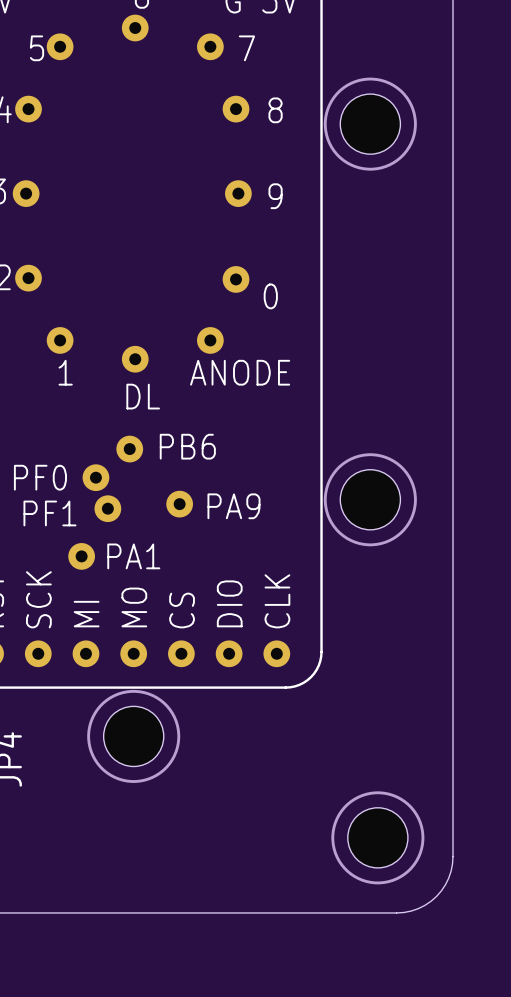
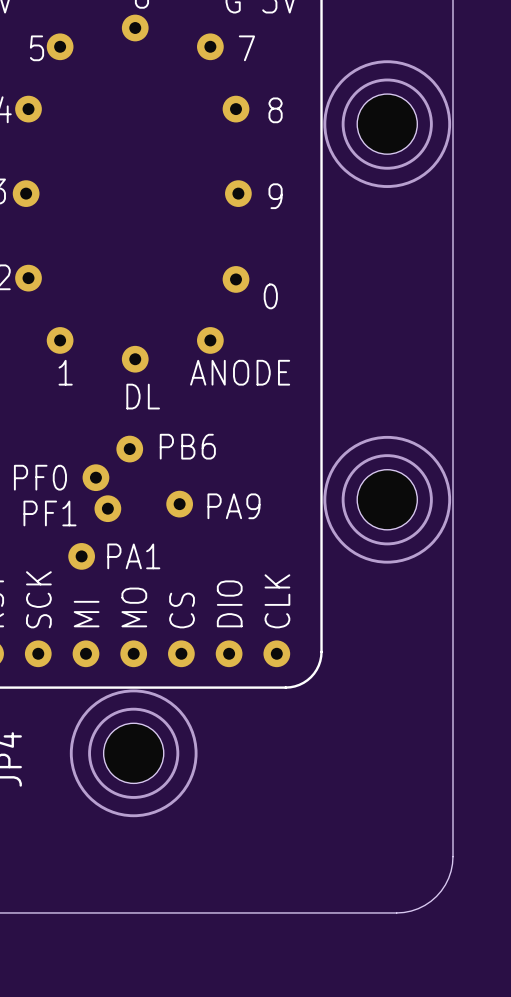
part footprint: [323, 77, 417, 171] -> [323, 60, 452, 188]
part footprint: [323, 453, 417, 547] -> [323, 435, 452, 564]
part footprint: [87, 689, 181, 783] -> [69, 689, 198, 818]
part: (377, 837) -> none

